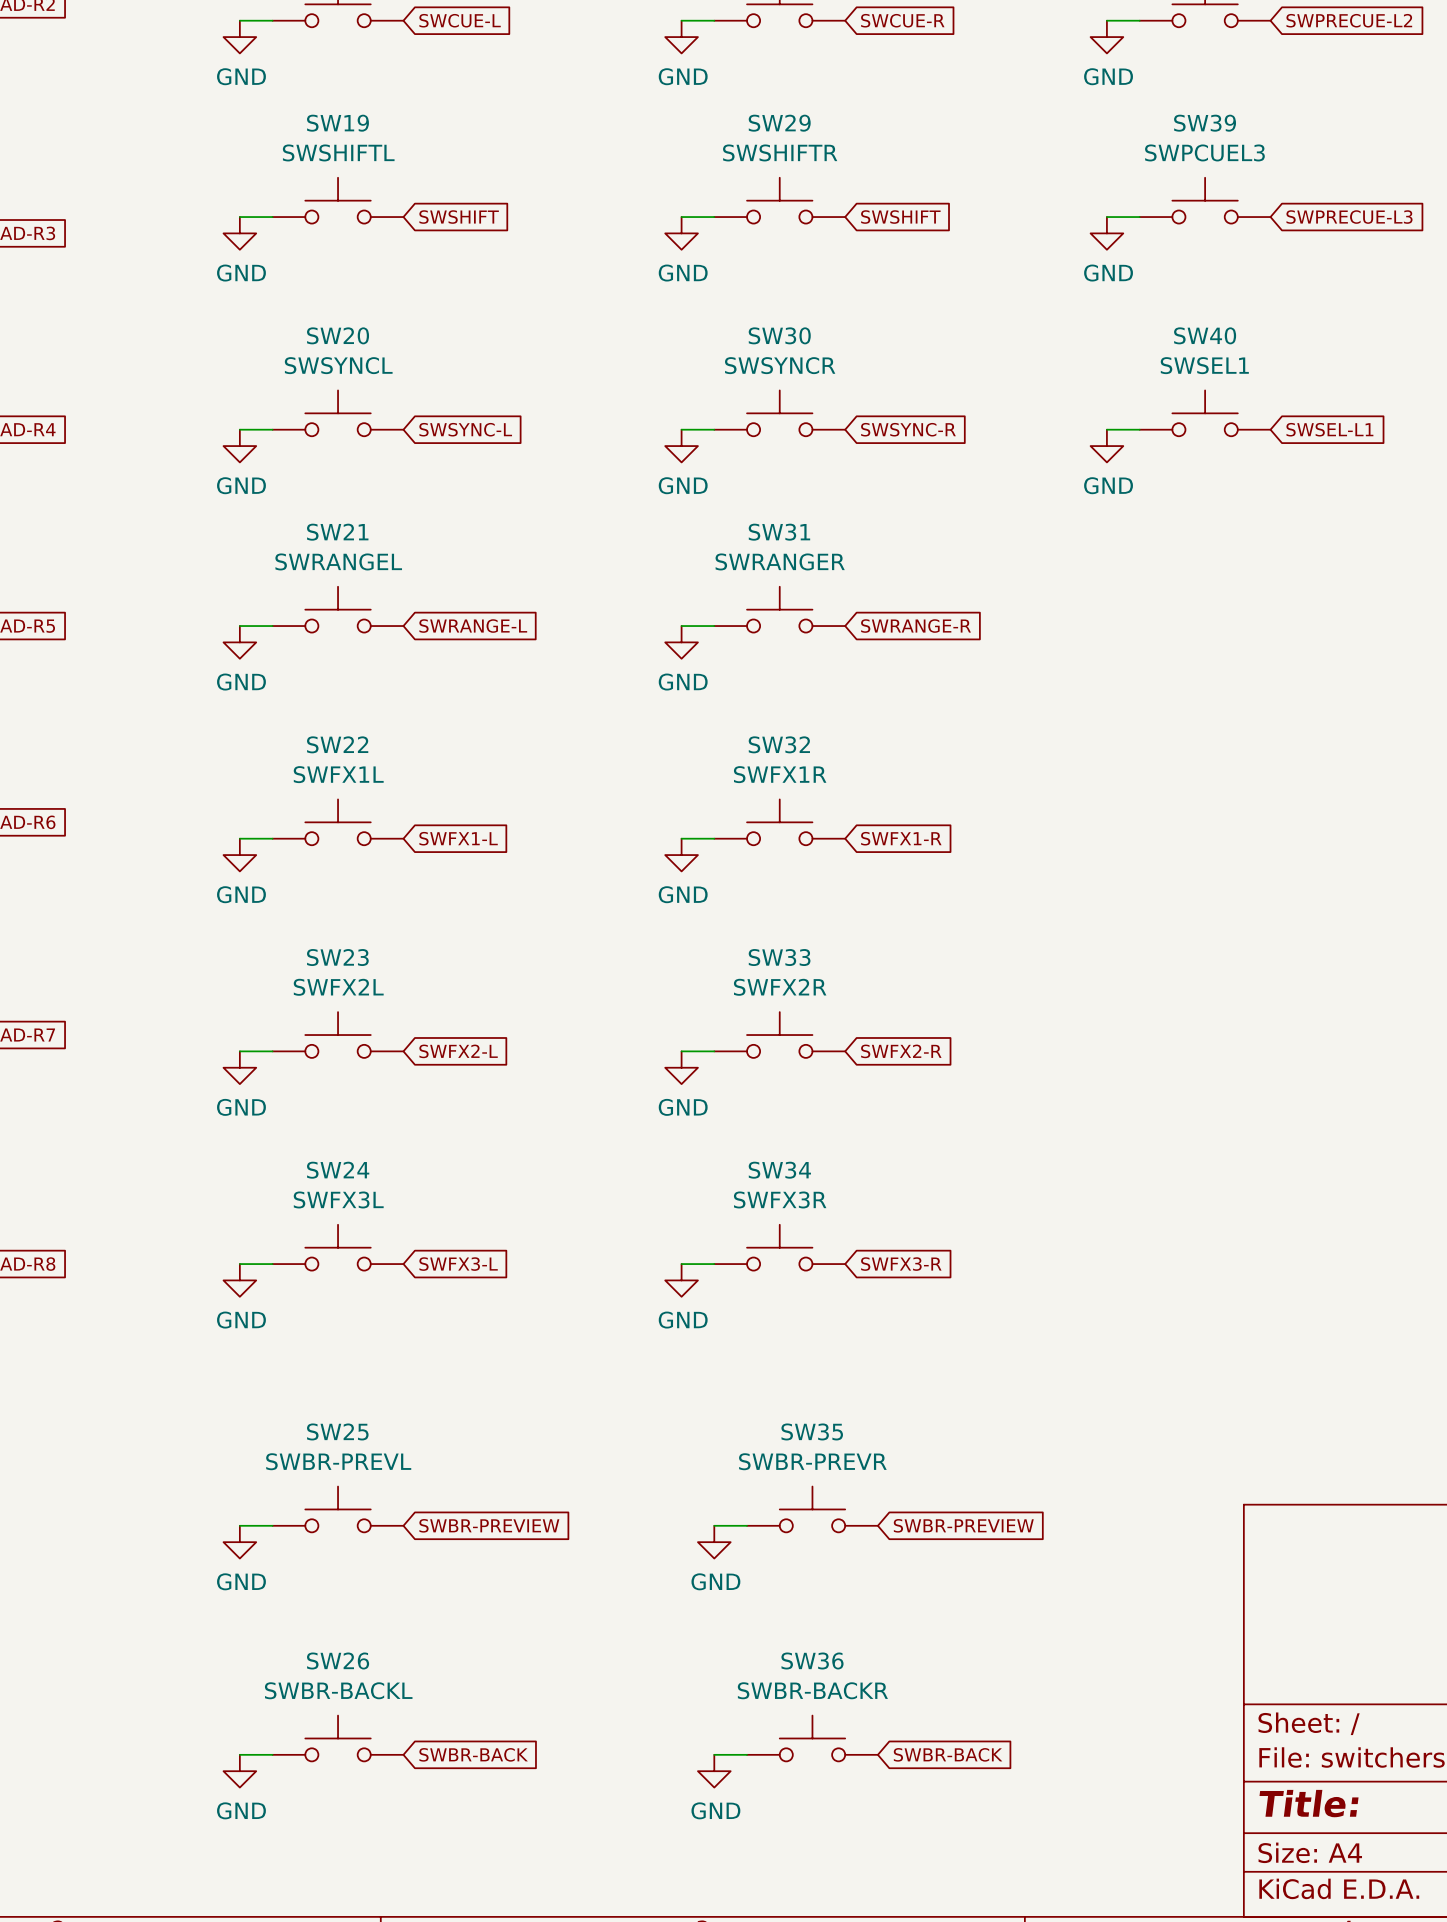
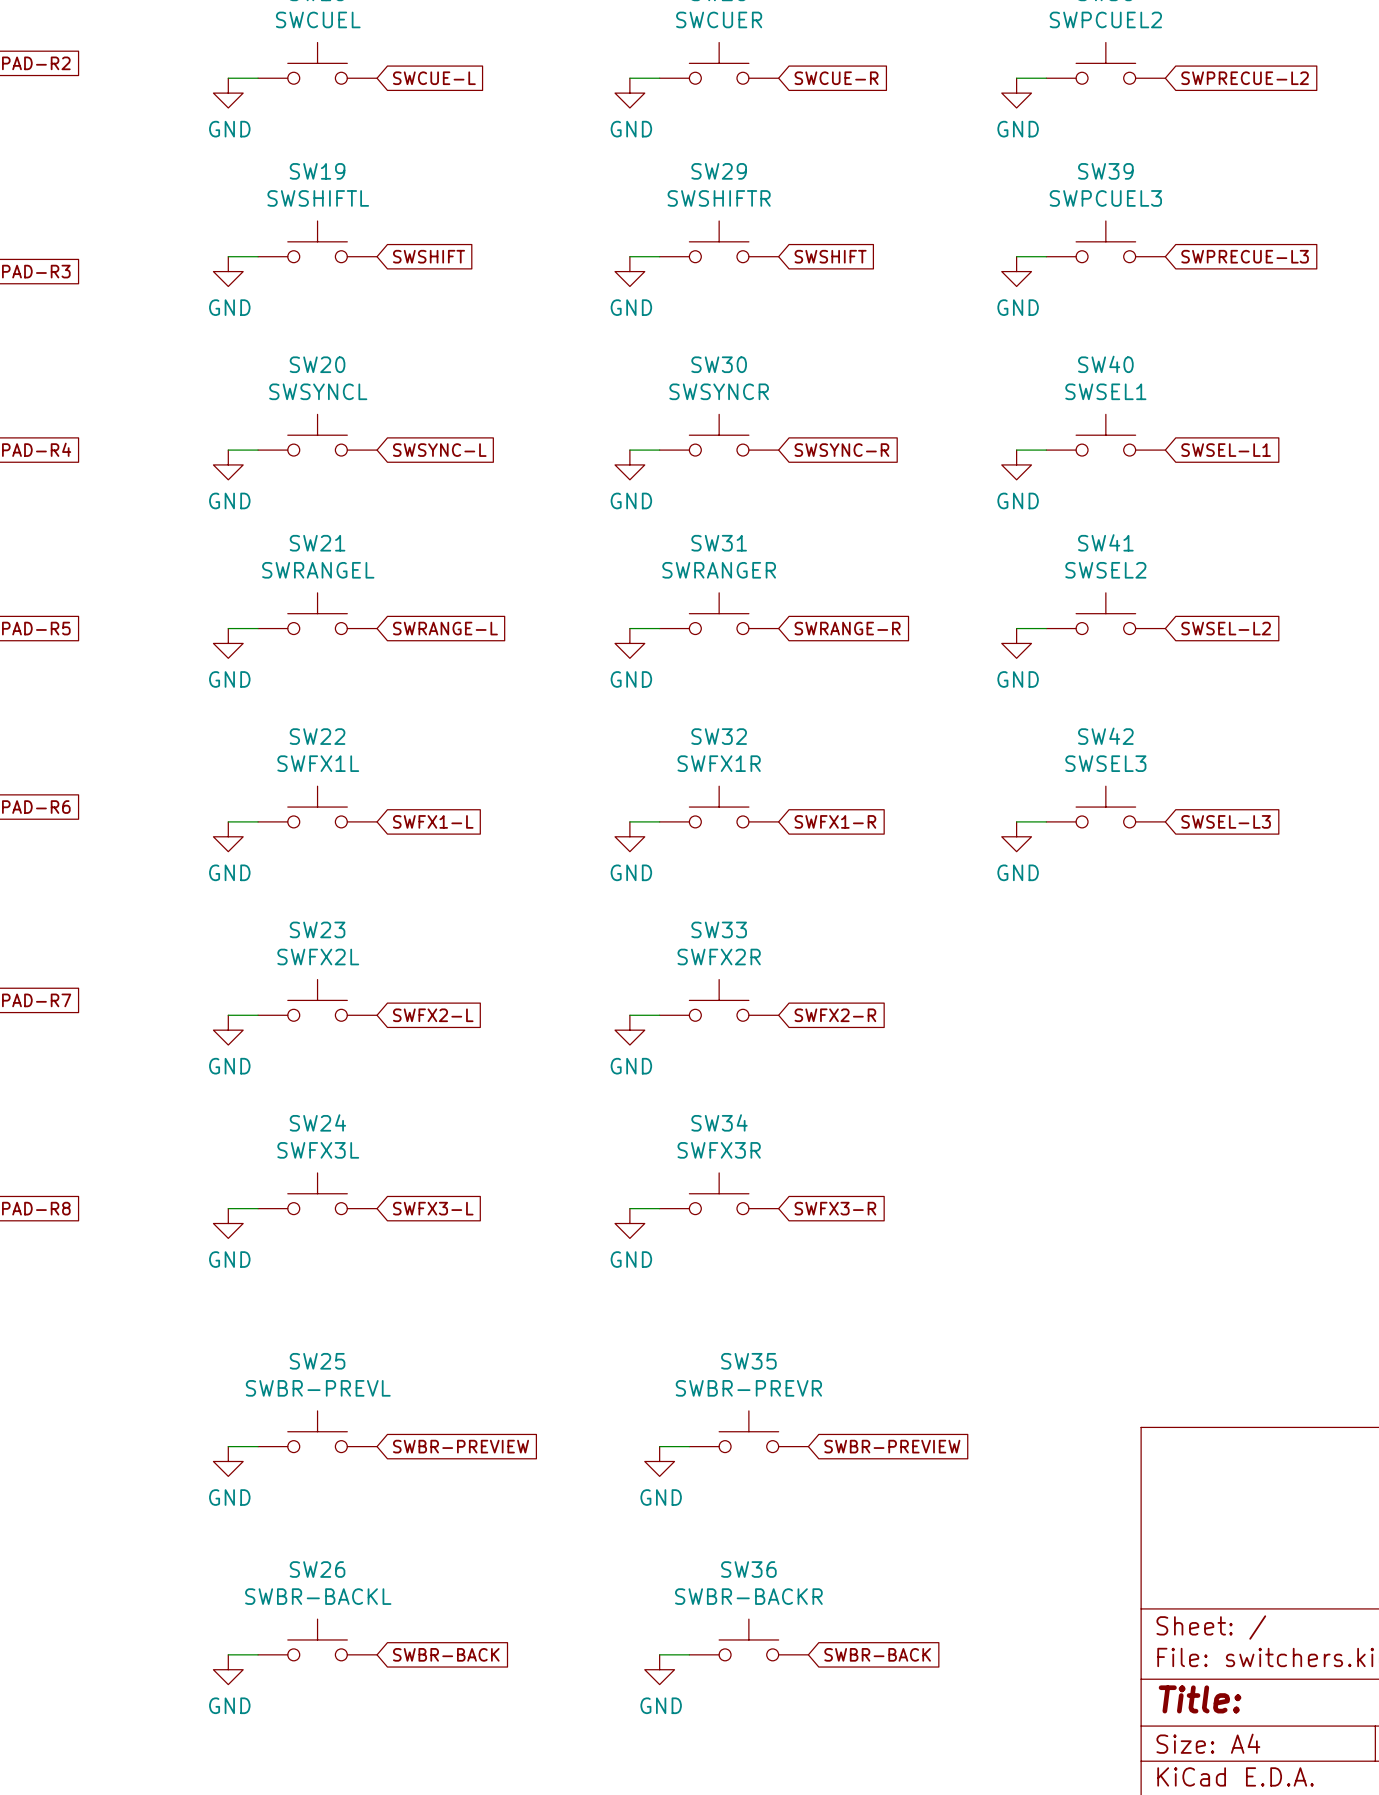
SW41: none -> SWSEL2 (1105, 613)
wire: none -> (1016, 628) (1046, 628)
global label: none -> SWSEL-L2 (1226, 628)
power symbol: none -> GND (1016, 643)
SW42: none -> SWSEL3 (1105, 807)
wire: none -> (1016, 821) (1046, 821)
global label: none -> SWSEL-L3 (1226, 821)
power symbol: none -> GND (1016, 836)

